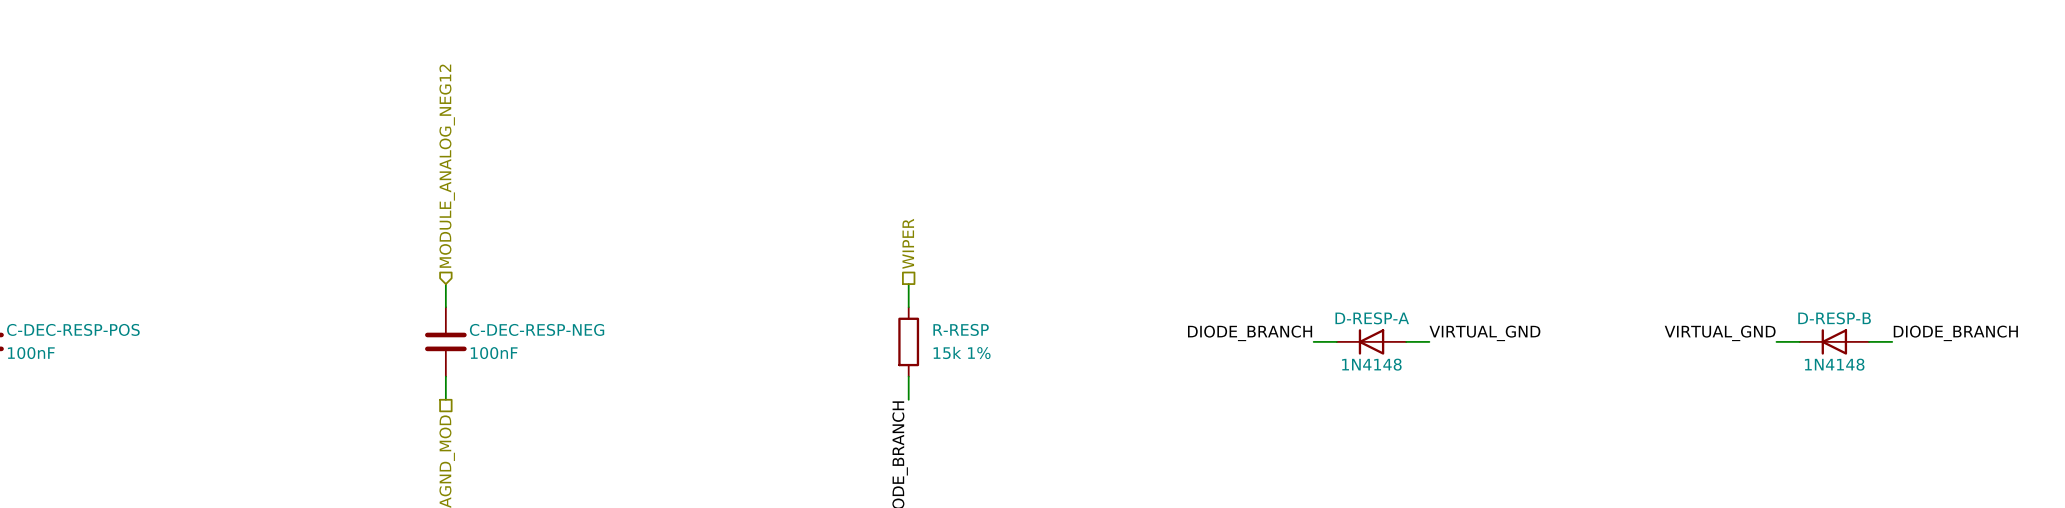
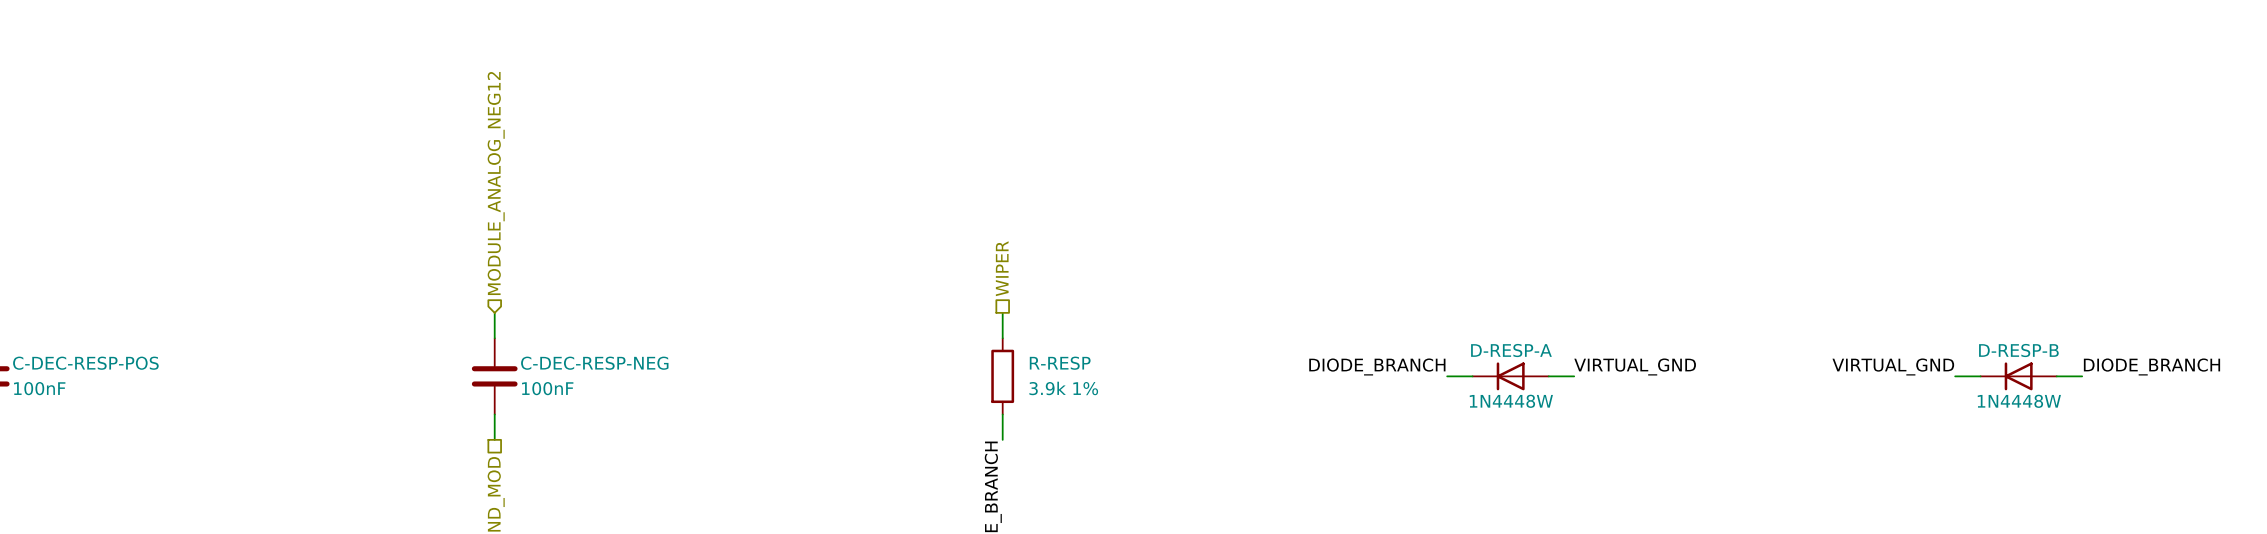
R-RESP value: 15k 1% (962, 352) -> 3.9k 1% (1063, 388)
D-RESP-A value: 1N4148 (1371, 364) -> 1N4448W (1511, 401)
D-RESP-B value: 1N4148 (1834, 364) -> 1N4448W (2019, 401)

